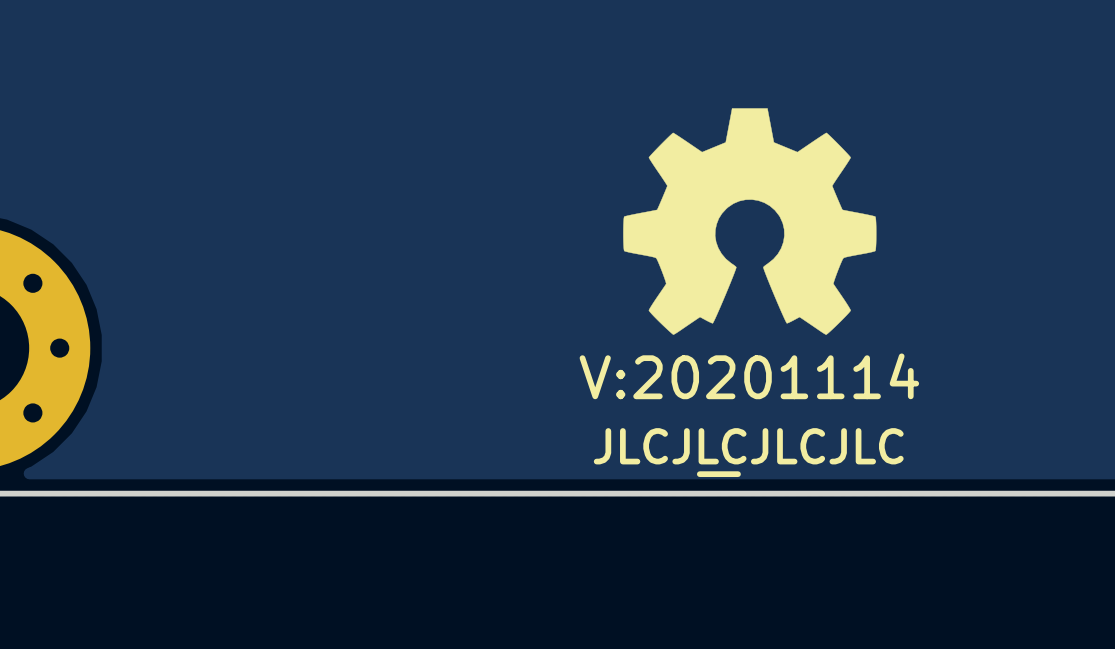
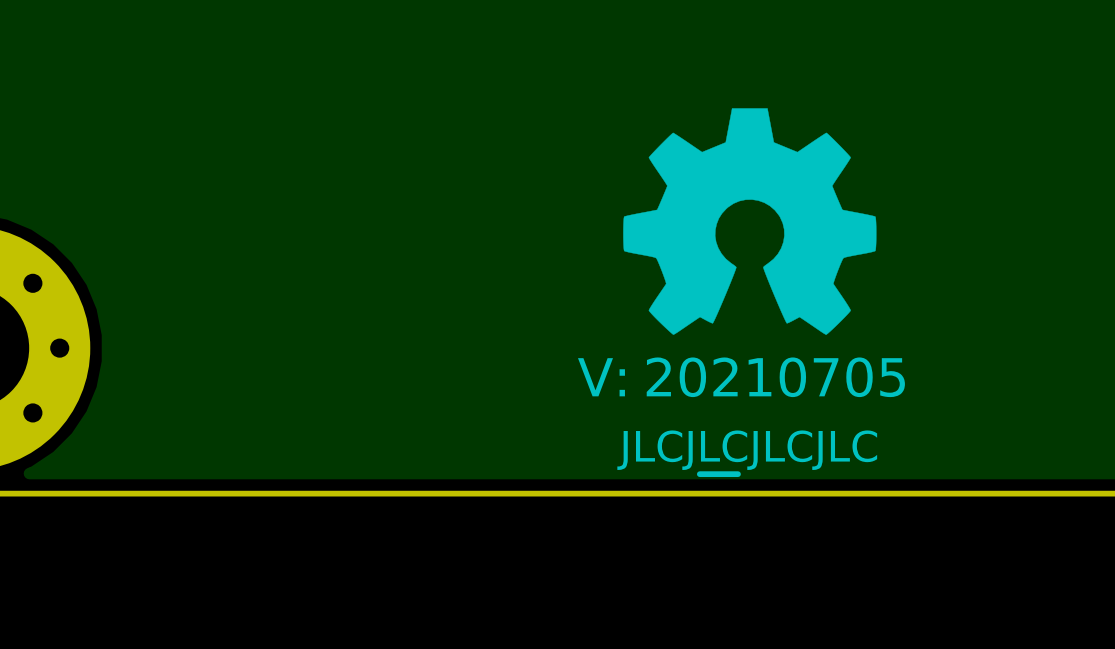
drawing shape: [579, 353, 920, 400] -> [578, 357, 905, 398]

